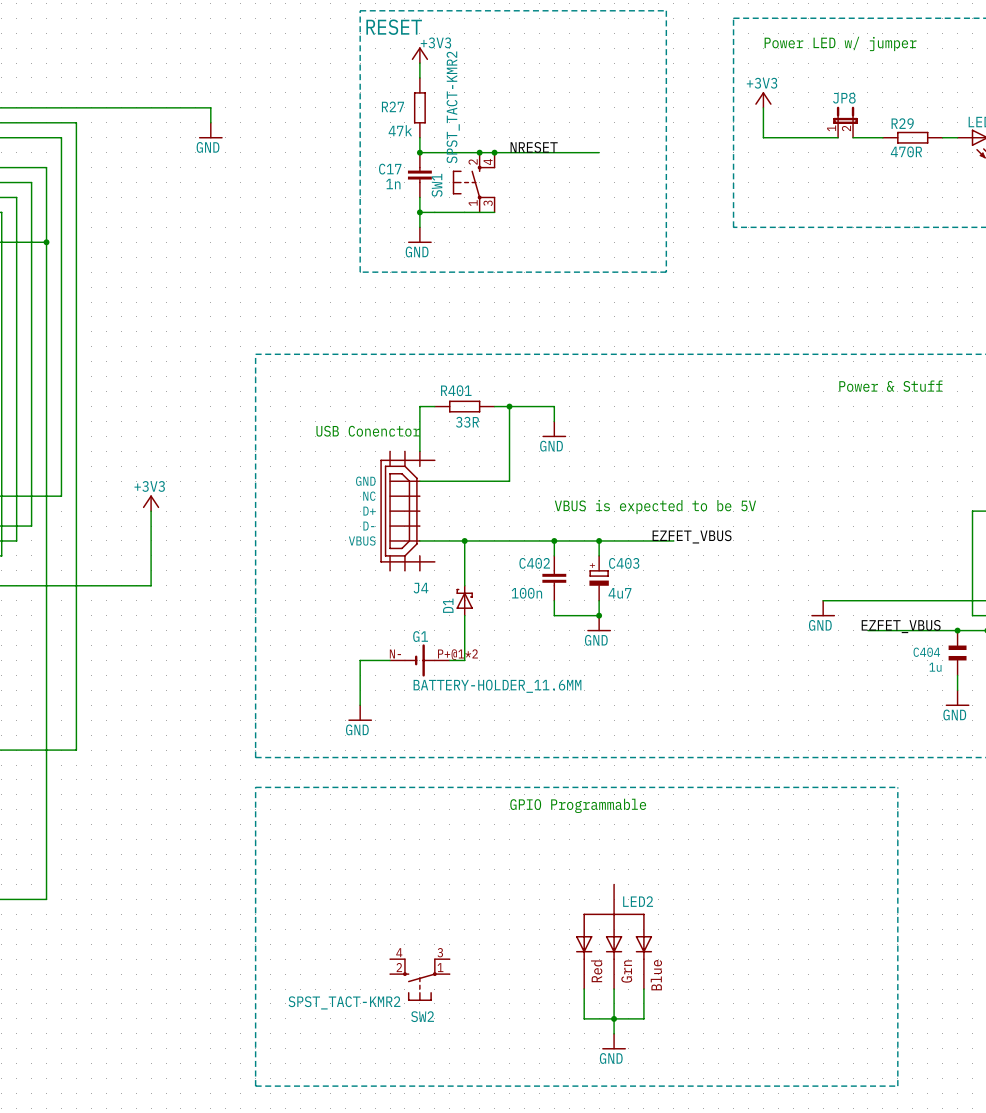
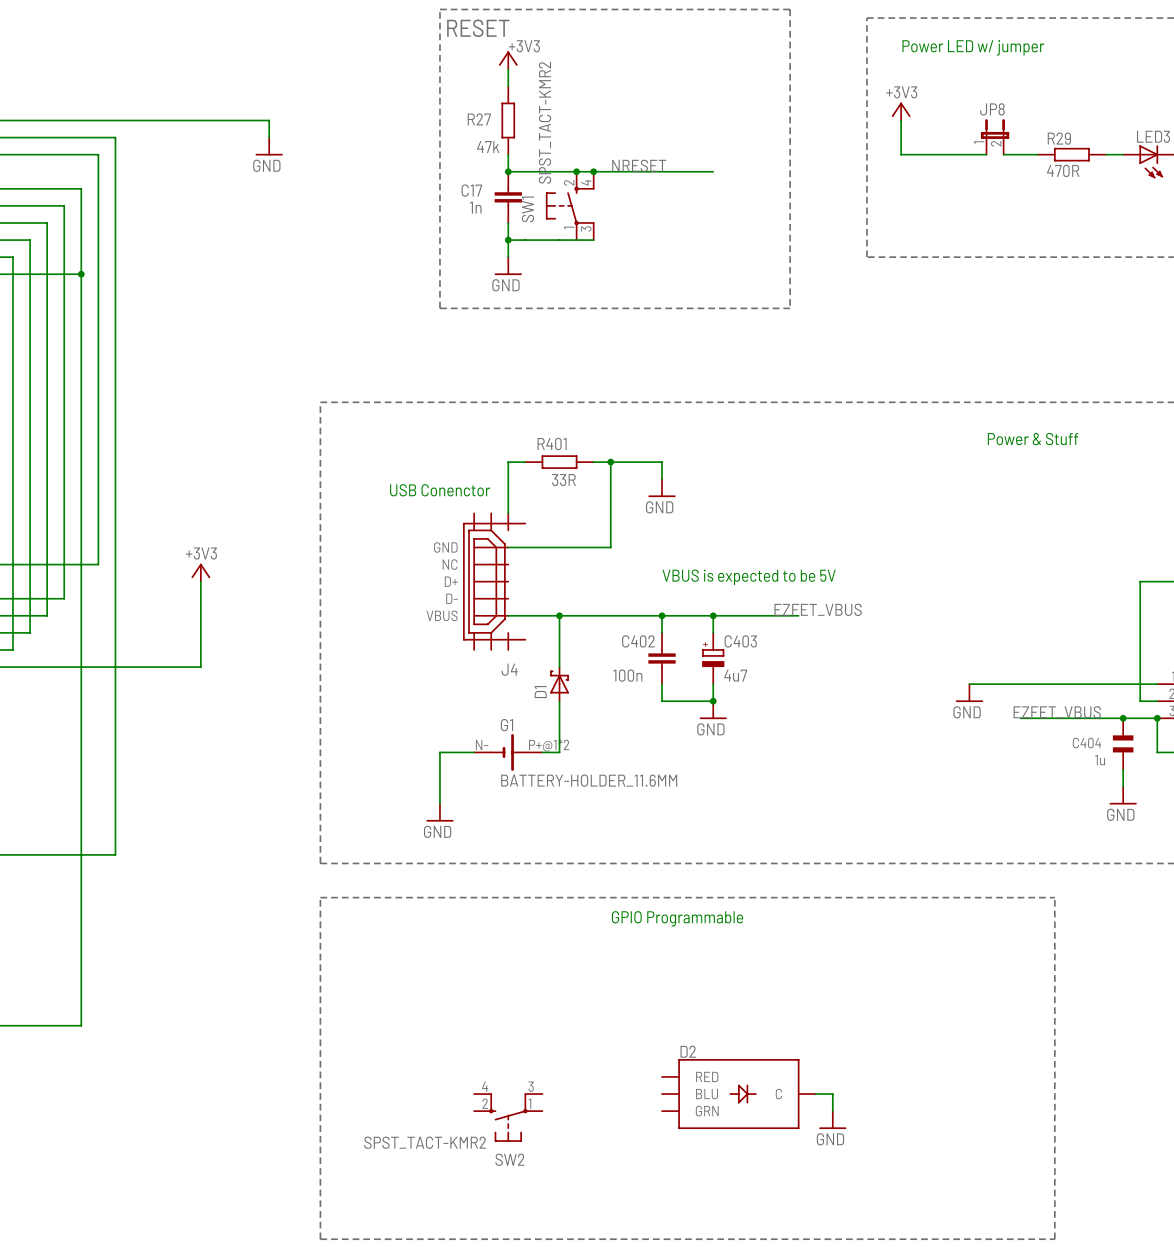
LED2: (614, 936) -> none
D2: none -> (738, 1094)
wire: none -> (815, 1094) (832, 1094) (832, 1111)
wire: (584, 989) (584, 1018) (643, 1018) (643, 989) -> none
wire: (614, 989) (614, 1033) -> none
junction: (614, 1018) -> none
power symbol position: GND (614, 1041) -> GND (832, 1120)

